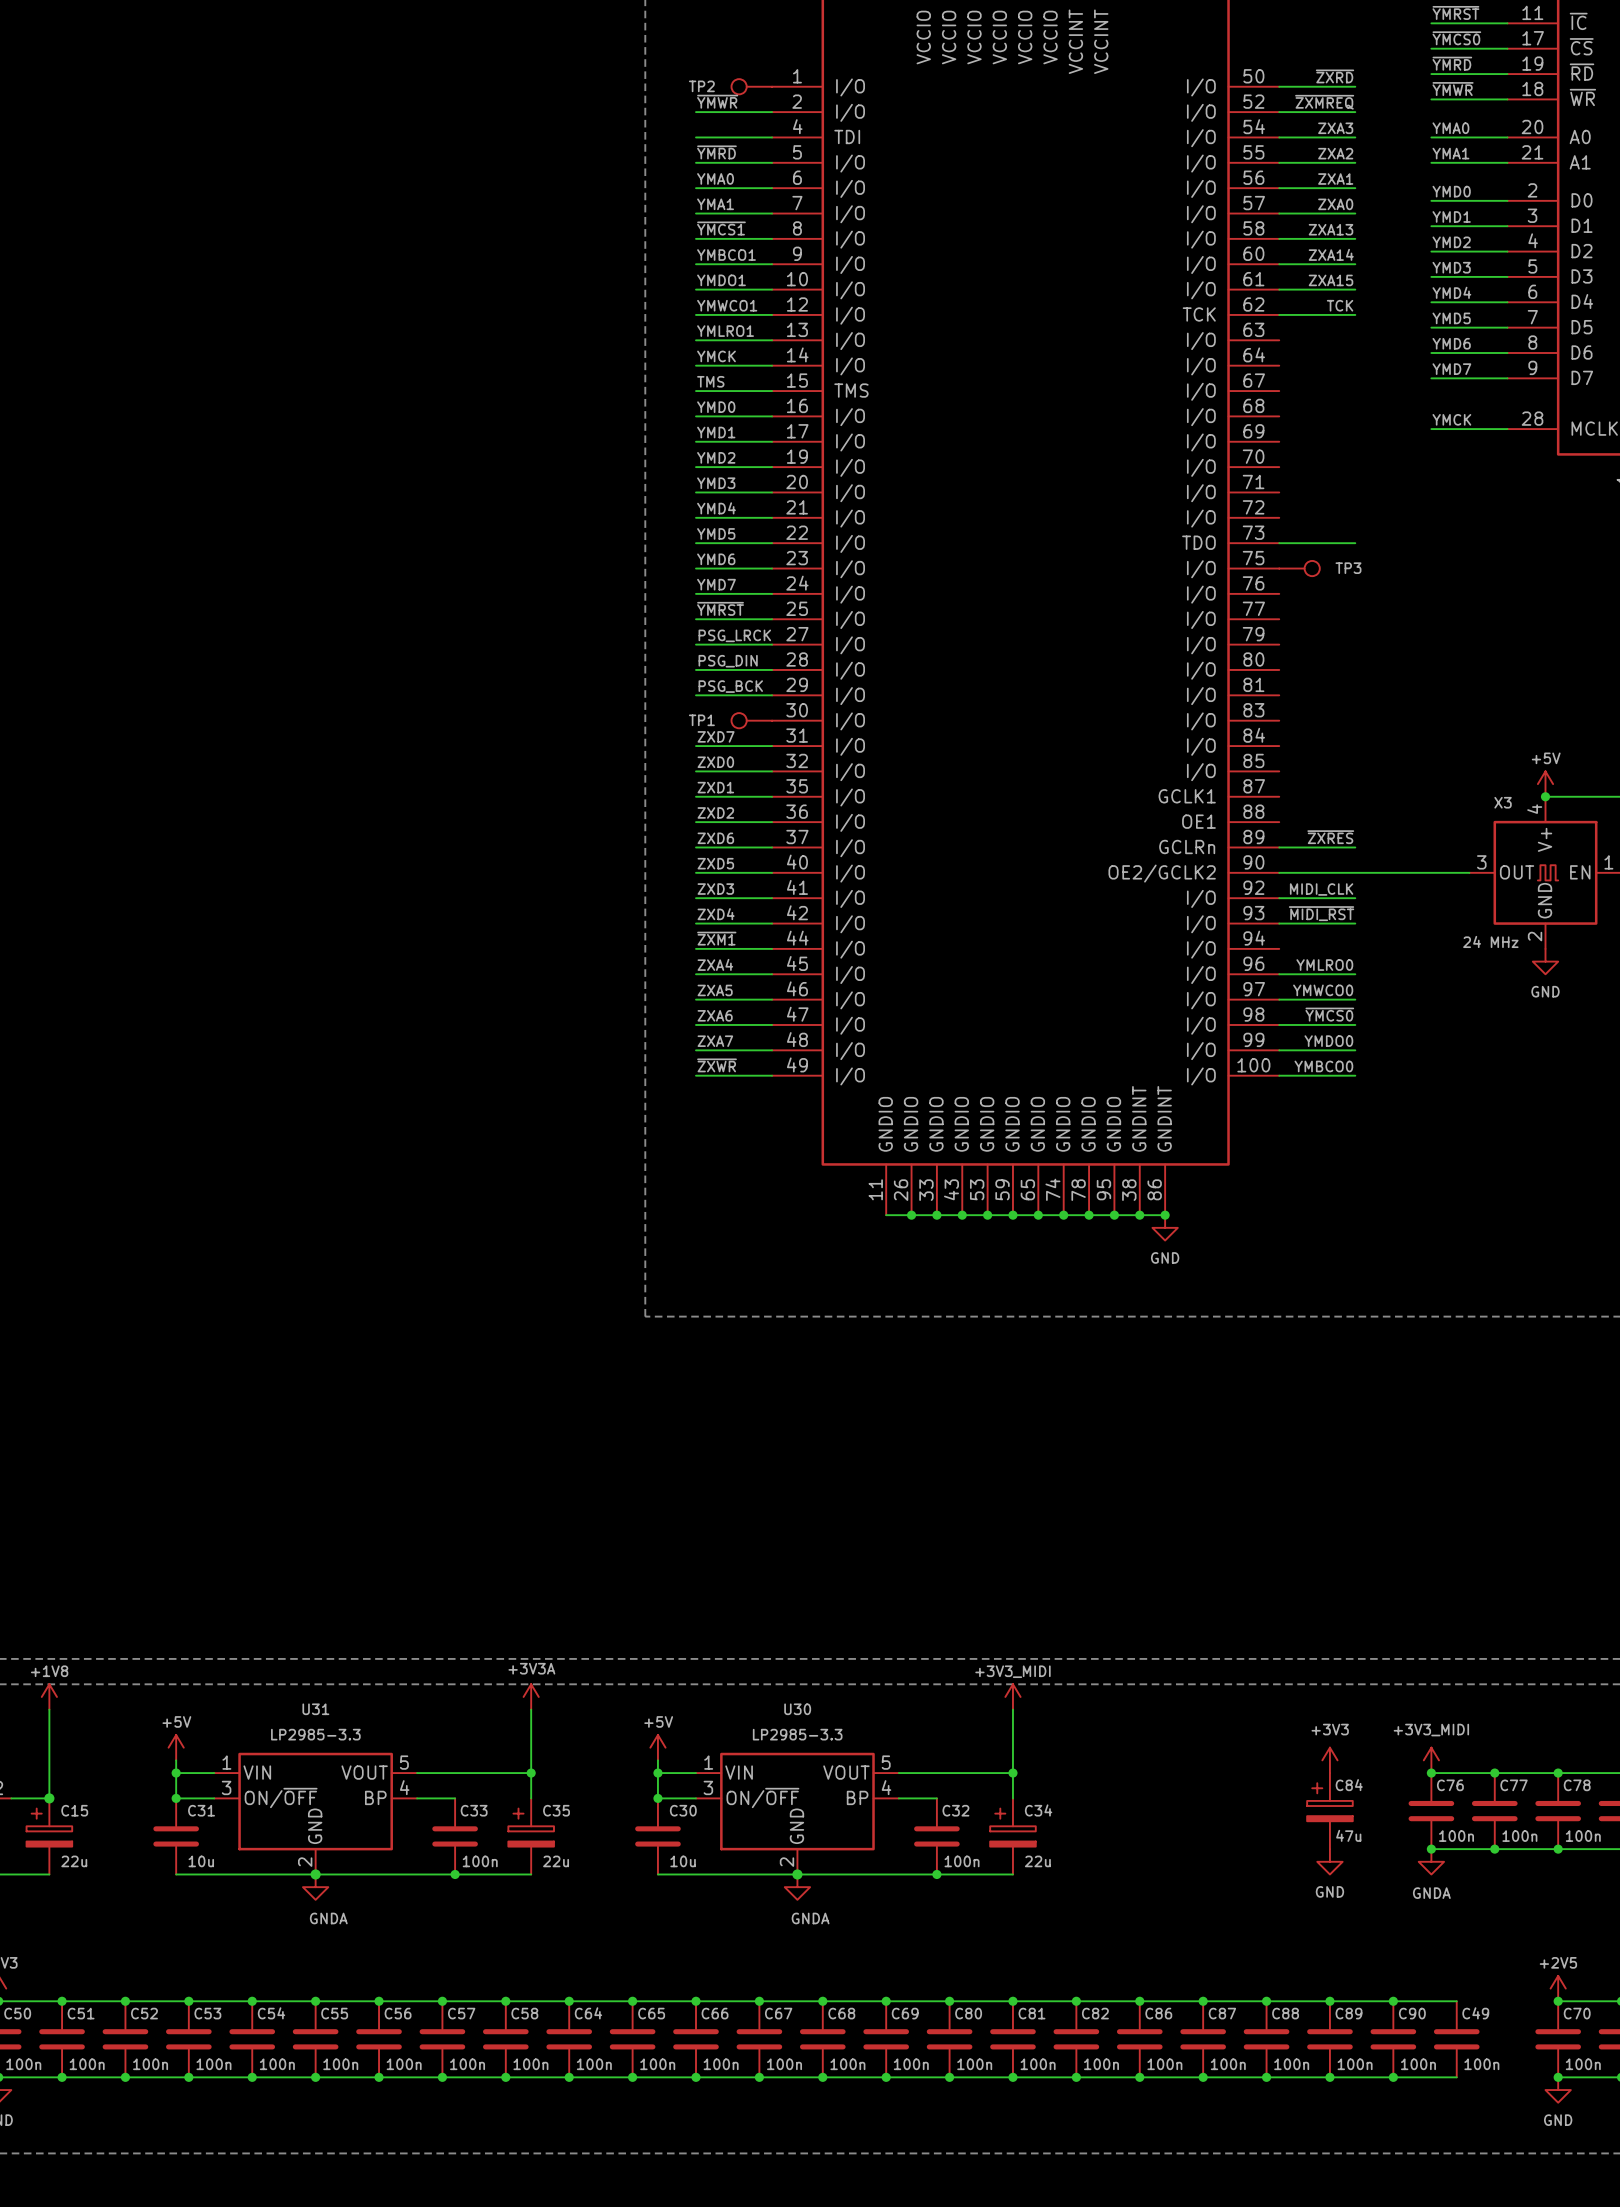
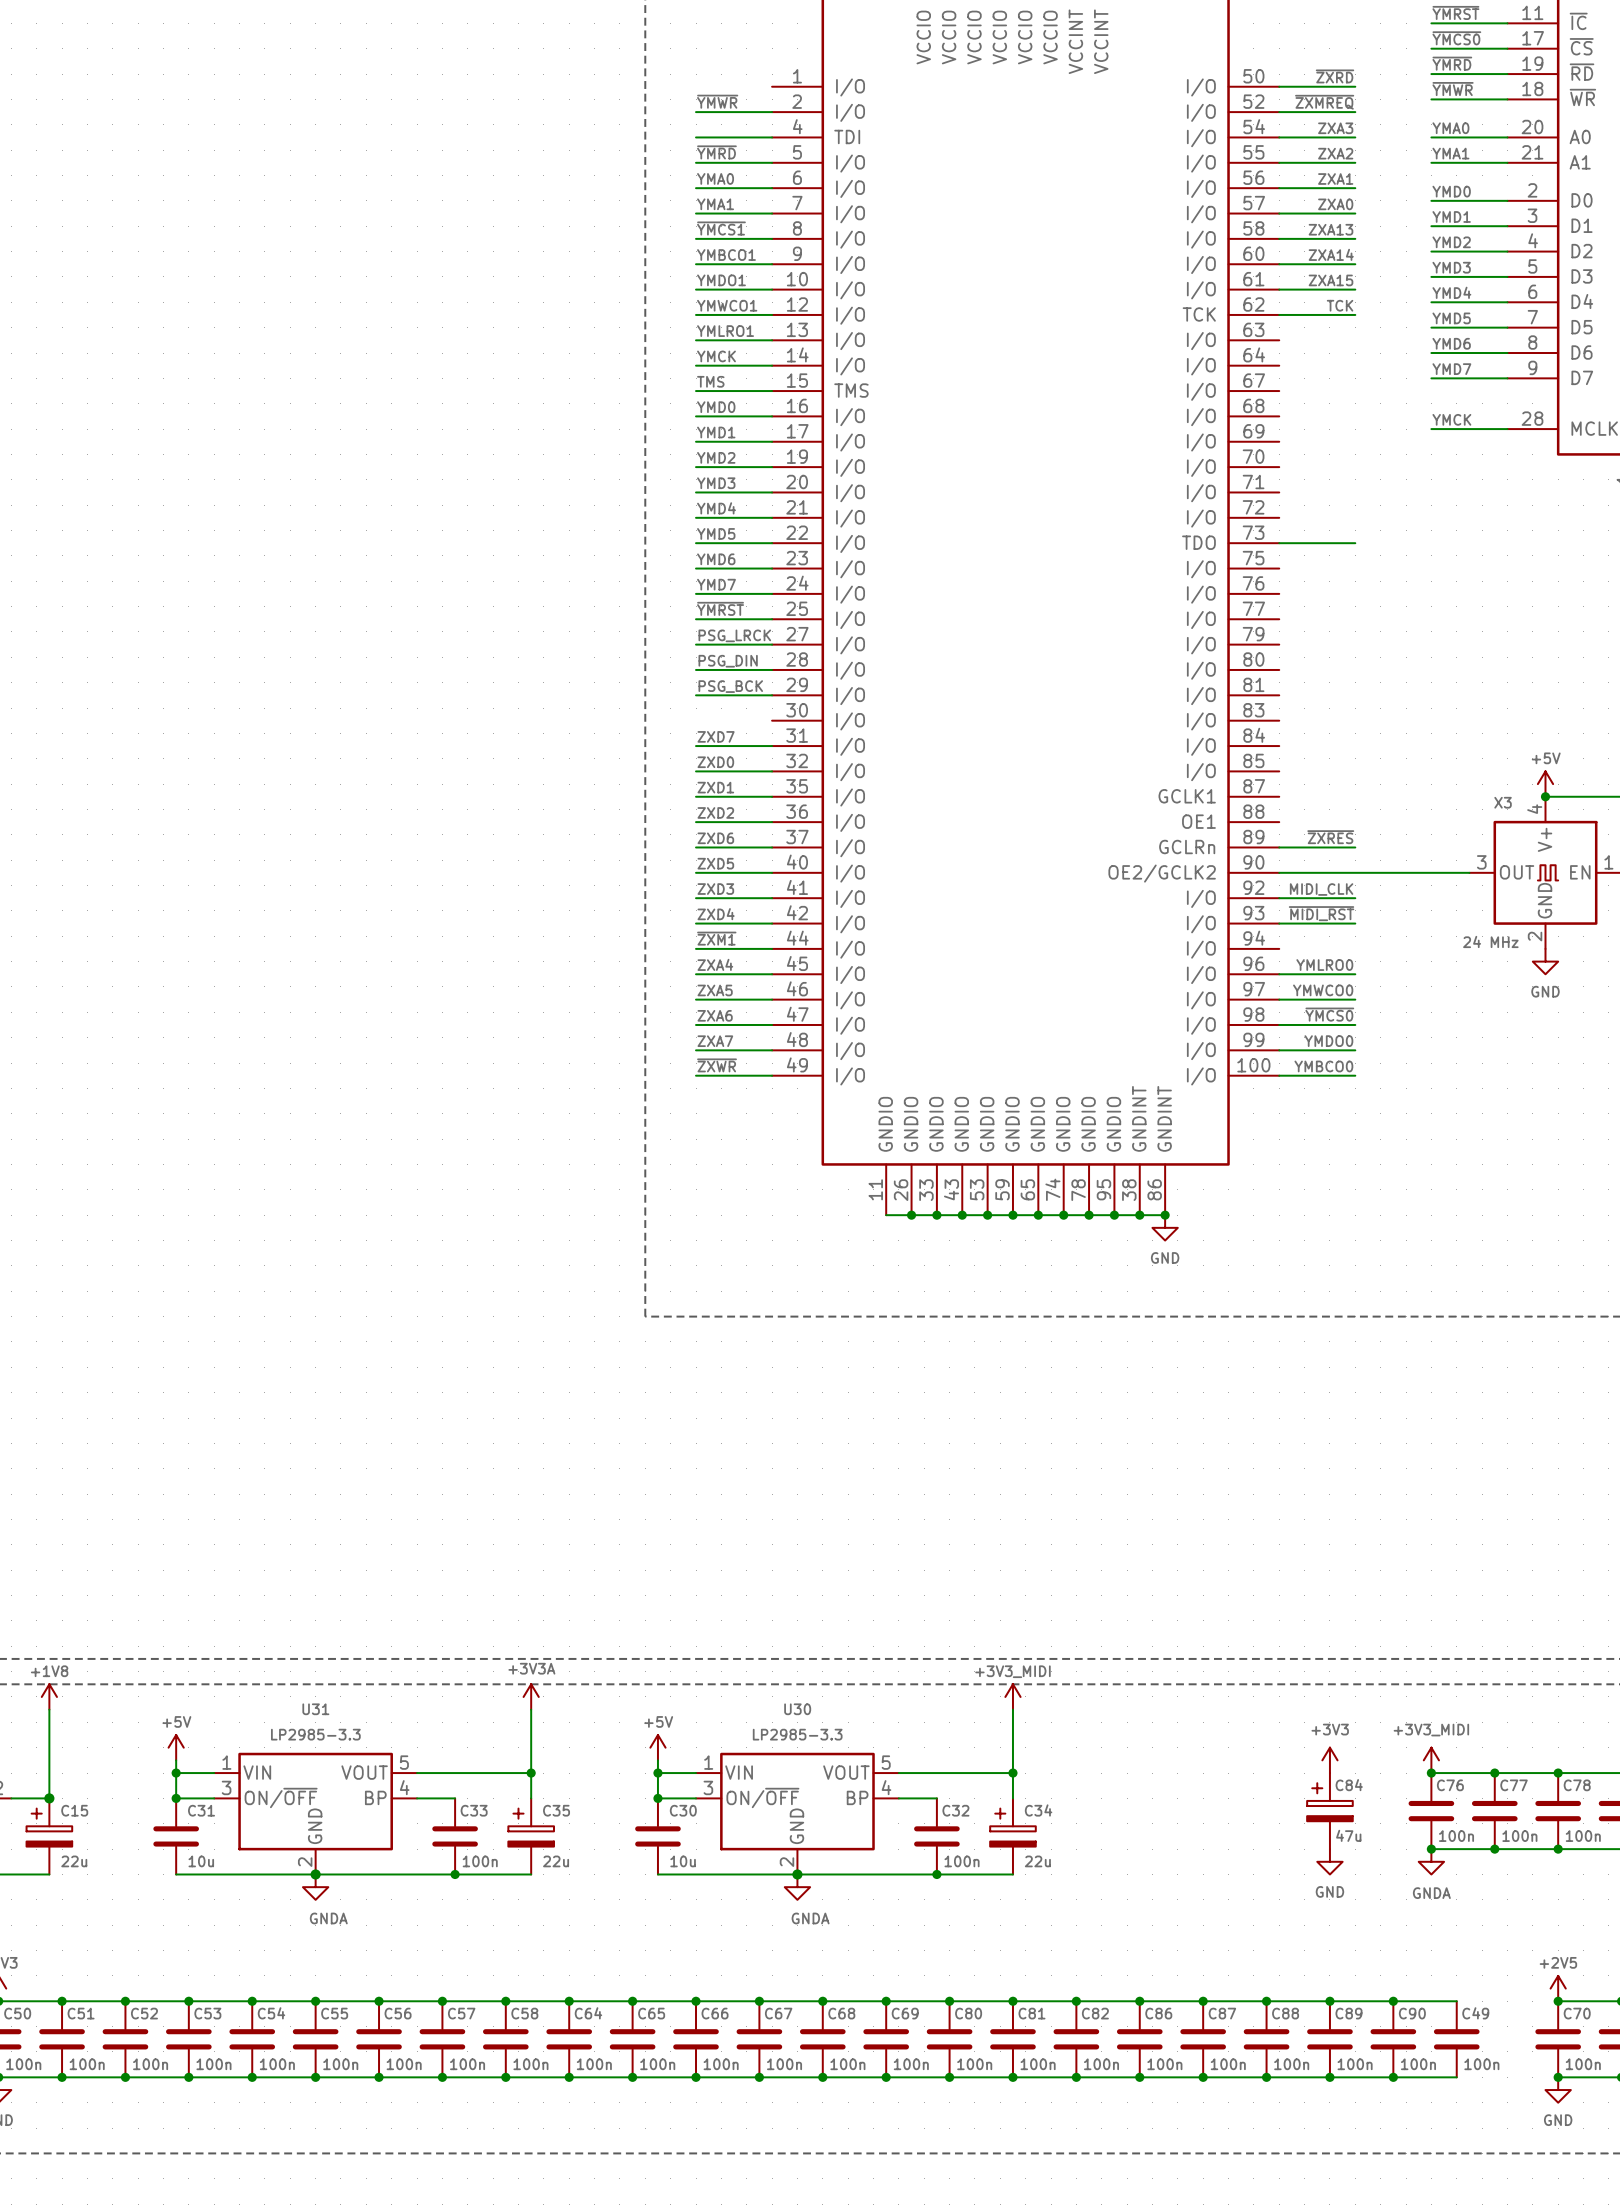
TP2: (751, 86) -> none
TP3: (1299, 568) -> none
TP1: (751, 720) -> none

